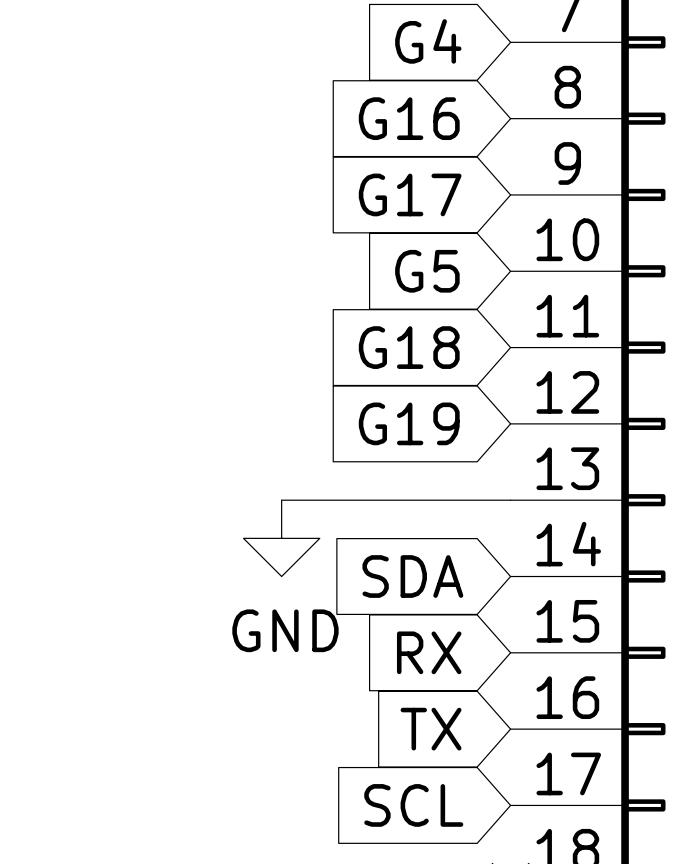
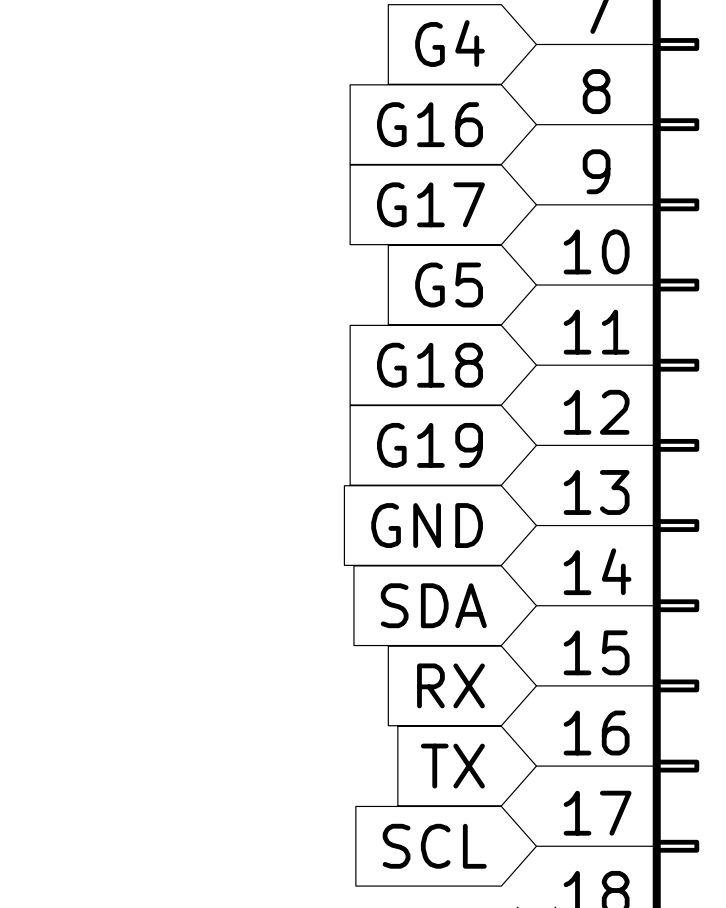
wire: (281, 500) (510, 500) -> none
global label: none -> GND (427, 525)
power symbol: GND (281, 538) -> none

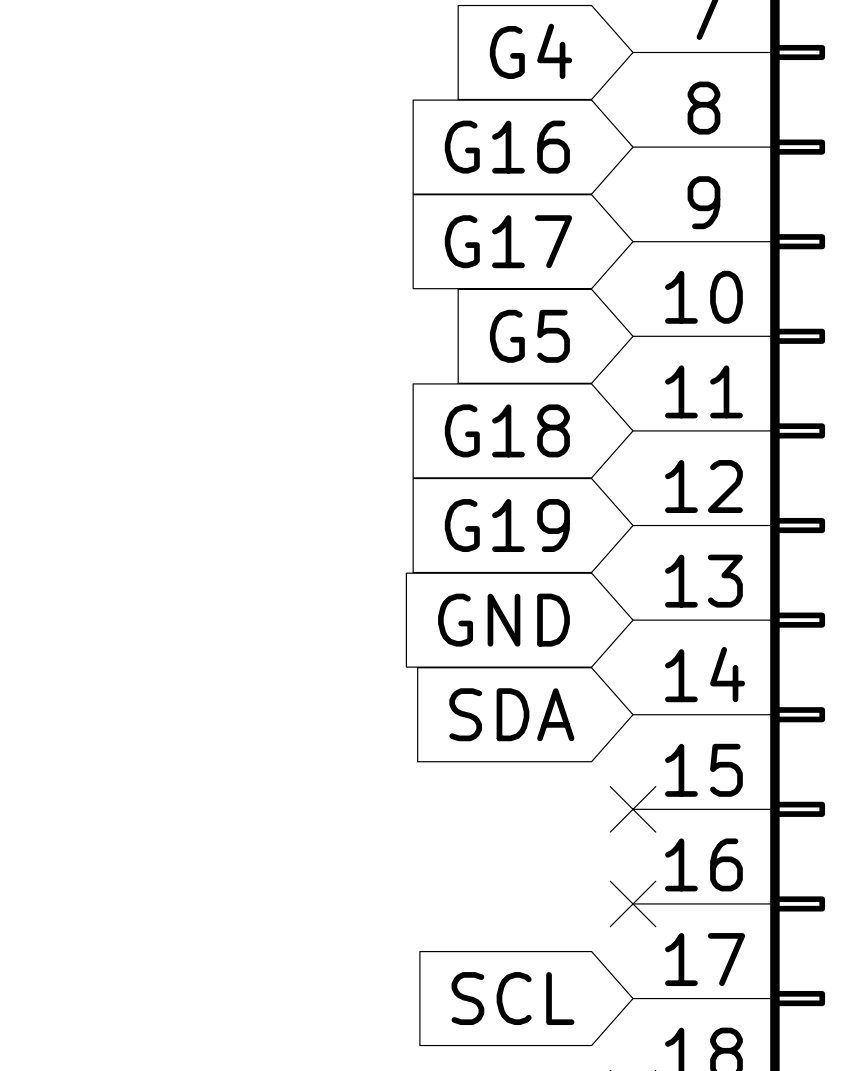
global label: RX (450, 685) -> none
no-connect mark: none -> (633, 809)
global label: TX (452, 766) -> none
no-connect mark: none -> (633, 903)

